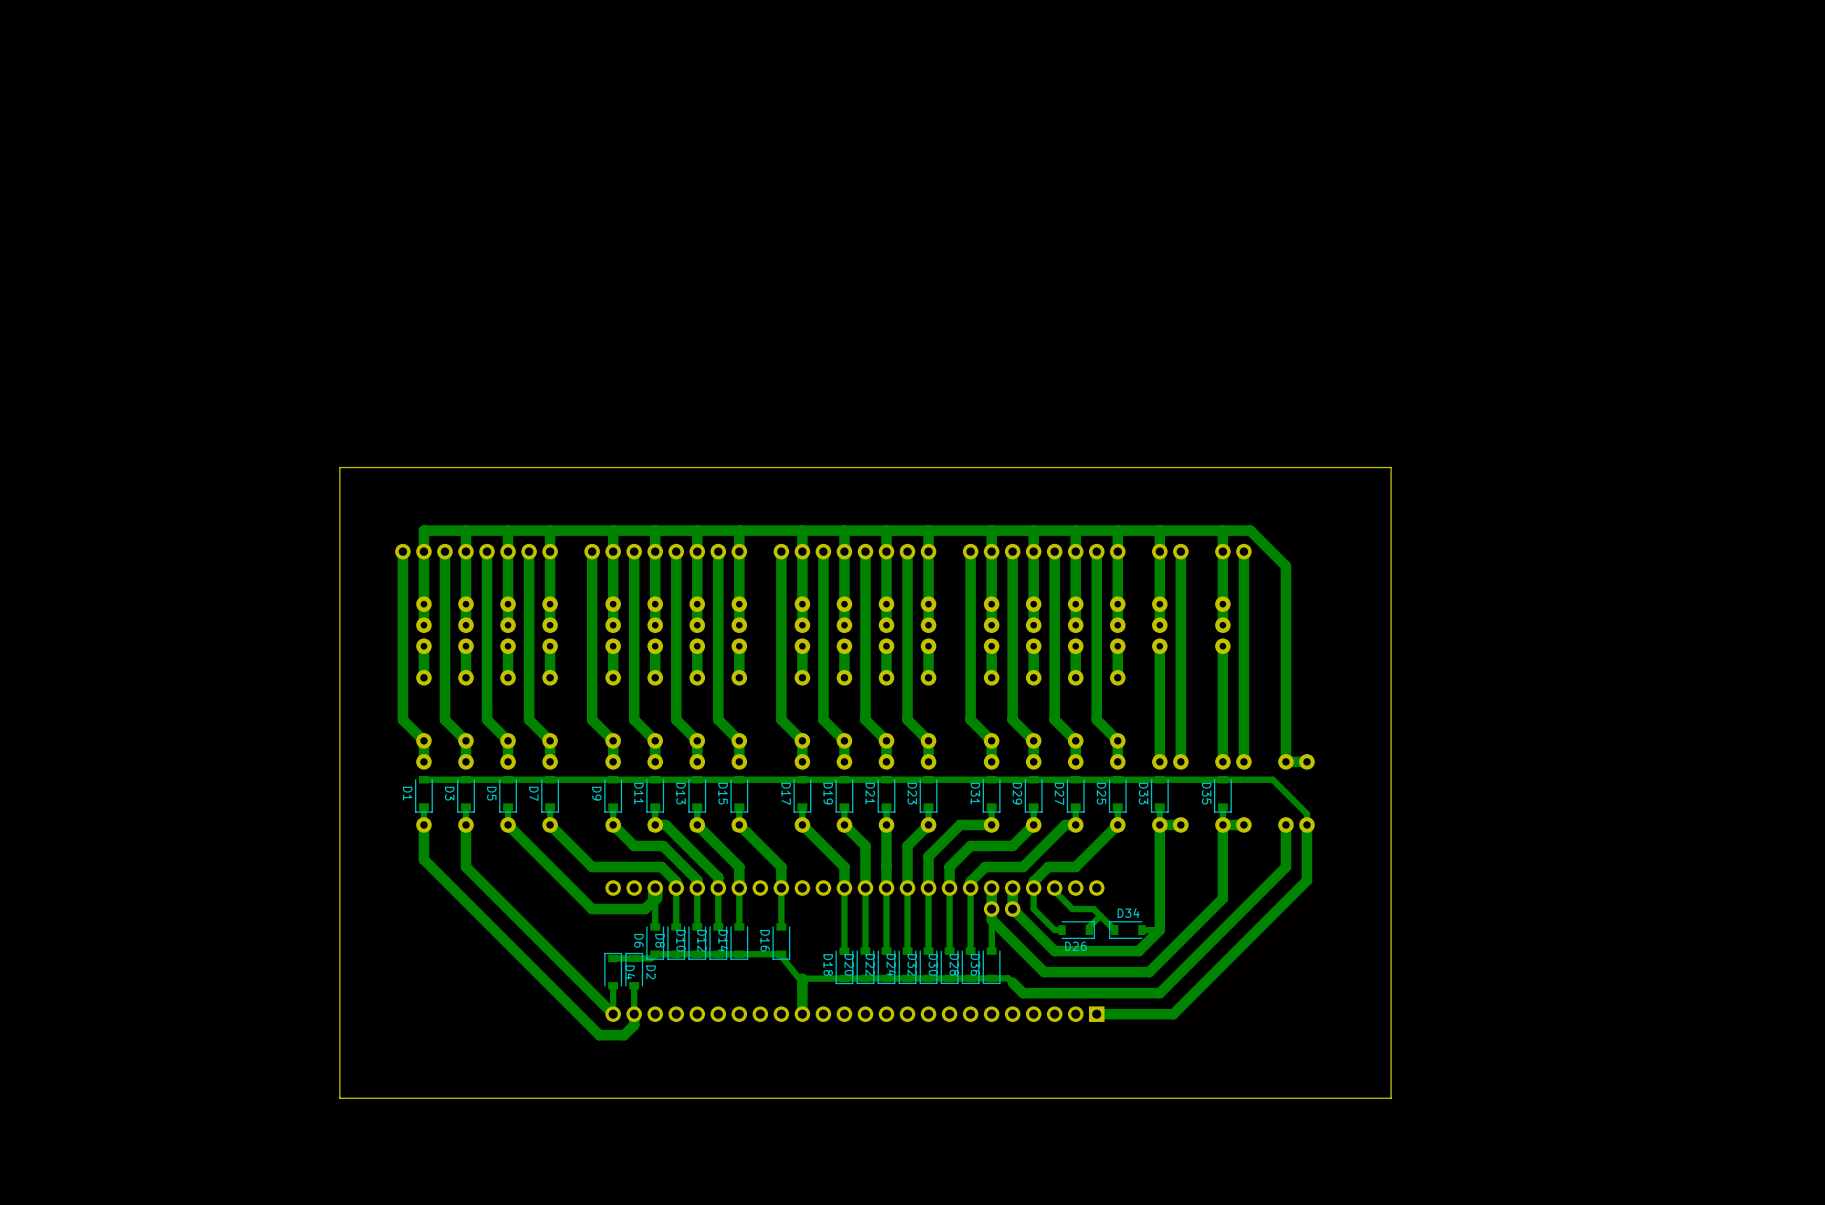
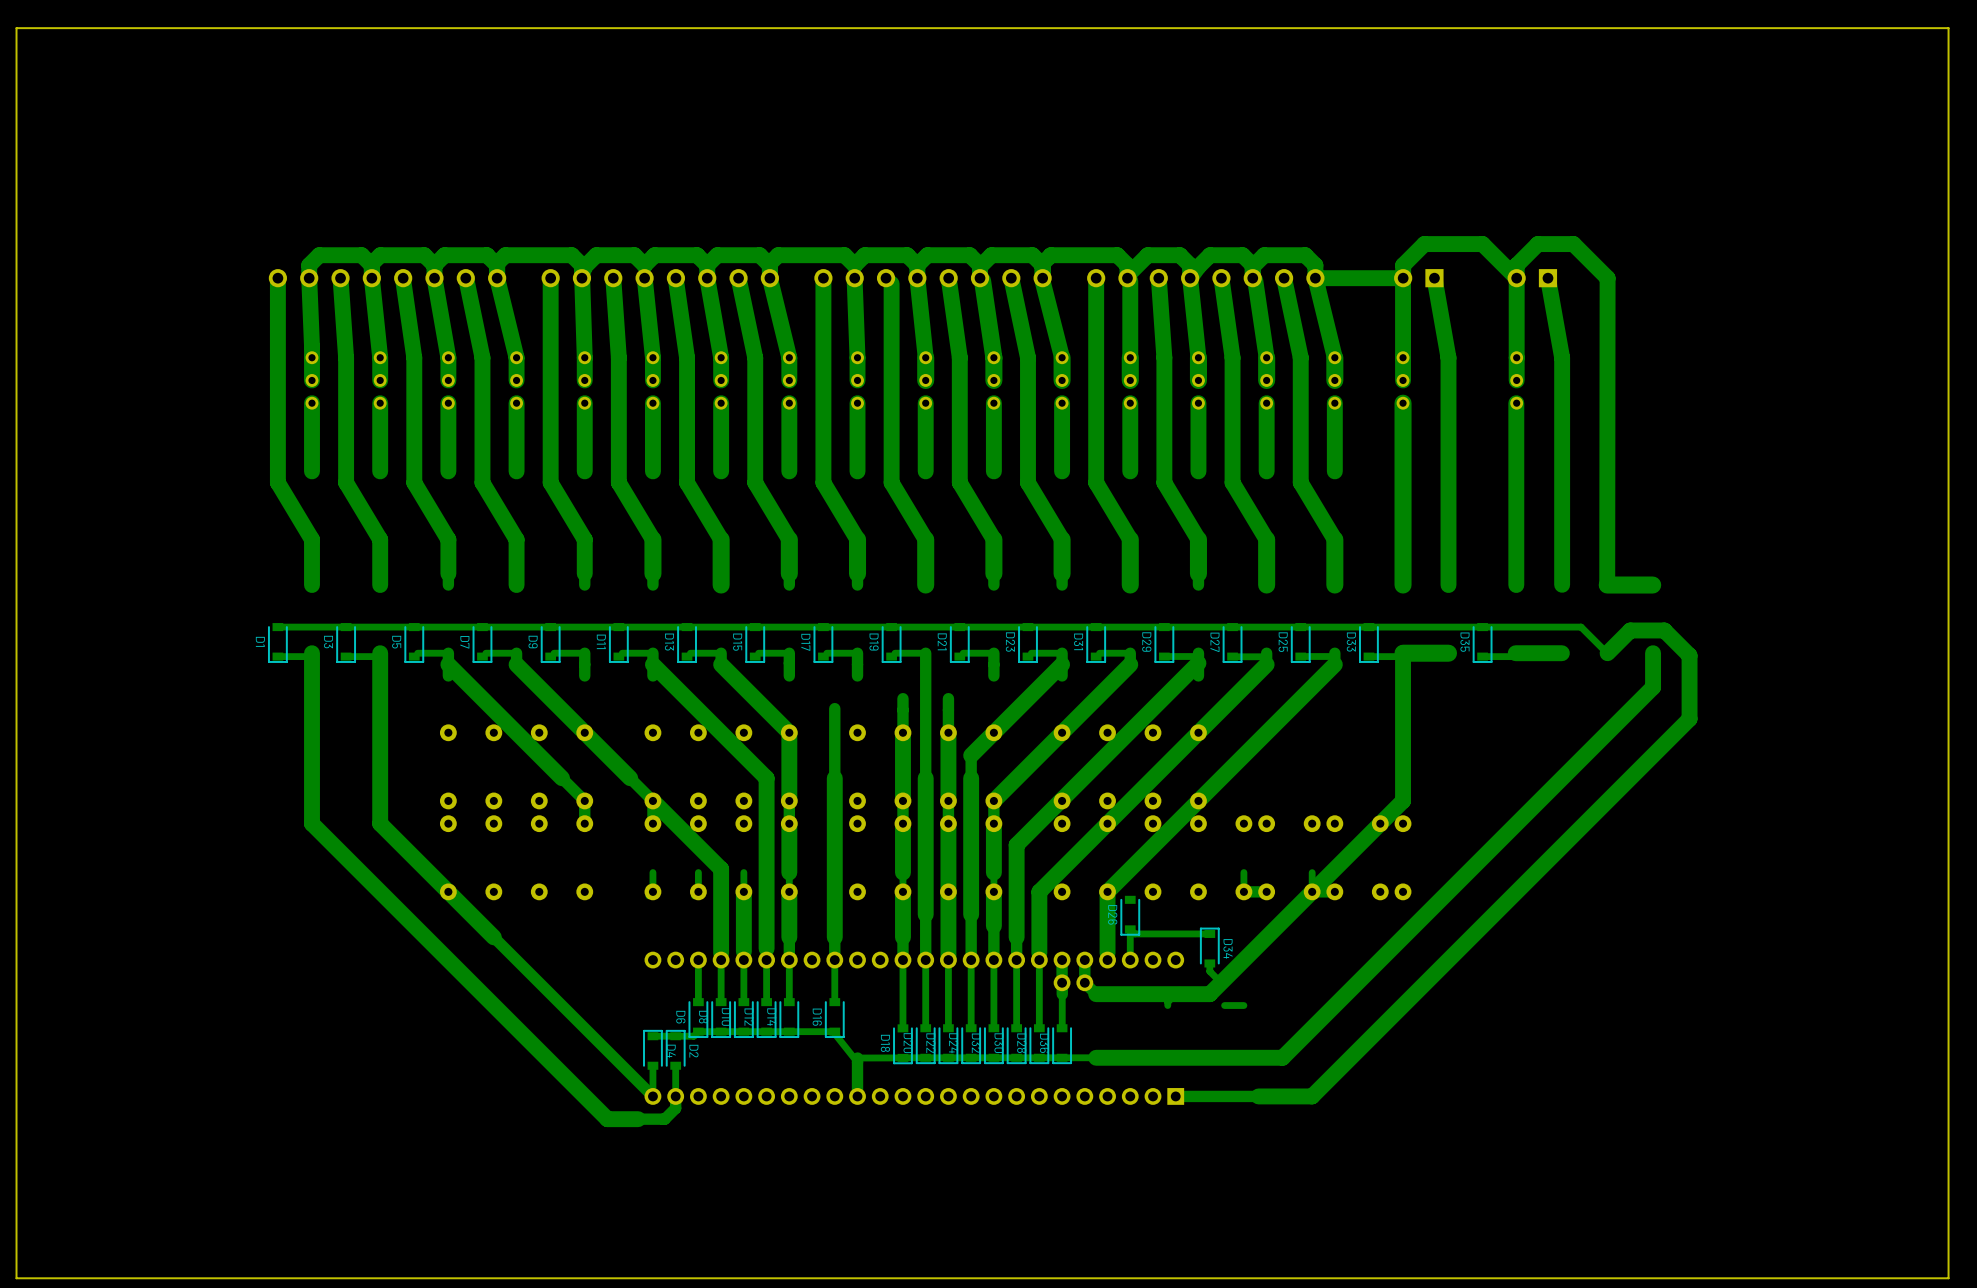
board edge: none -> (1948, 28) (16, 28) (16, 1278) (1948, 1278) (1948, 28)
track: none -> (371, 265) (361, 255) (319, 255) (309, 265) (312, 380)
track: none -> (434, 265) (424, 255) (380, 255) (371, 263) (380, 357) (380, 380)
track: none -> (434, 265) (434, 278) (448, 357) (448, 380)
track: none -> (497, 265) (487, 255) (444, 255) (434, 265)
track: none -> (707, 265) (707, 278) (721, 357) (721, 380)
track: none -> (707, 265) (697, 255) (654, 255) (644, 265) (634, 255) (596, 255) (584, 266) (581, 275)
track: none -> (769, 265) (759, 255) (717, 255) (707, 265)
track: none -> (917, 265) (925, 357) (925, 380)
track: none -> (917, 265) (907, 255) (864, 255) (854, 265) (844, 255) (778, 255) (769, 263) (769, 278) (789, 357) (789, 380)
track: none -> (917, 265) (927, 255) (969, 255) (980, 265) (980, 278)
track: none -> (1042, 265) (1032, 255) (991, 255) (980, 266)
track: none -> (1252, 266) (1264, 255) (1305, 255) (1315, 265) (1315, 278)
track: none -> (1127, 275) (1147, 255) (1180, 255) (1190, 265) (1190, 278)
track: none -> (644, 277) (652, 357) (652, 380)
track: none -> (277, 278) (277, 482) (312, 539) (312, 585)
track: none -> (340, 278) (346, 357) (346, 482) (380, 539) (380, 585)
part: none -> (387, 278)
track: none -> (466, 278) (482, 357) (482, 482) (516, 539) (516, 585)
track: none -> (550, 278) (550, 482) (584, 539) (584, 573)
track: none -> (582, 277) (584, 380)
track: none -> (581, 278) (581, 265) (571, 255) (505, 255) (497, 263) (497, 278) (516, 357) (516, 380)
track: none -> (613, 278) (618, 357) (618, 482) (652, 539) (652, 573)
part: none -> (660, 278)
track: none -> (675, 278) (687, 357) (687, 482) (721, 539) (721, 585)
track: none -> (738, 278) (755, 357) (755, 482) (789, 539) (789, 573)
track: none -> (823, 278) (823, 482) (857, 539) (857, 573)
track: none -> (854, 278) (857, 380)
part: none -> (933, 278)
track: none -> (948, 278) (959, 357) (959, 482) (993, 539) (993, 573)
track: none -> (1011, 278) (1027, 357) (1027, 482) (1062, 539) (1062, 573)
track: none -> (1096, 278) (1096, 482) (1130, 539) (1130, 585)
track: none -> (1127, 278) (1127, 265) (1117, 255) (1050, 255) (1042, 263) (1042, 278)
track: none -> (1158, 278) (1164, 357) (1164, 482) (1198, 539) (1198, 573)
track: none -> (1190, 278) (1198, 357) (1198, 380)
part: none -> (1205, 278)
track: none -> (1221, 278) (1232, 357) (1232, 482) (1266, 539) (1266, 585)
track: none -> (1252, 278) (1252, 265) (1242, 255) (1210, 255) (1190, 278)
track: none -> (1284, 278) (1300, 357) (1300, 482) (1334, 539) (1334, 585)
track: none -> (1315, 278) (1334, 357) (1334, 380)
track: none -> (1403, 278) (1403, 380)
part: none -> (1418, 278)
track: none -> (1434, 278) (1448, 357) (1448, 585)
track: none -> (1516, 278) (1482, 244) (1424, 244) (1403, 265) (1403, 278) (1315, 278)
part: none -> (1532, 278)
track: none -> (1547, 278) (1562, 357) (1562, 584)
track: none -> (982, 280) (993, 357) (993, 380)
track: none -> (1130, 280) (1130, 380)
track: none -> (1255, 280) (1266, 357) (1266, 380)
track: none -> (1042, 281) (1062, 357) (1062, 380)
track: none -> (891, 283) (891, 482) (925, 539) (925, 585)
part: none -> (312, 380)
part: none -> (380, 380)
part: none -> (448, 380)
part: none -> (516, 380)
part: none -> (584, 380)
part: none -> (652, 380)
part: none -> (721, 380)
part: none -> (789, 380)
part: none -> (857, 380)
part: none -> (925, 380)
part: none -> (993, 380)
part: none -> (1062, 380)
part: none -> (1130, 380)
part: none -> (1198, 380)
part: none -> (1266, 380)
part: none -> (1334, 380)
part: none -> (1403, 380)
track: none -> (1516, 380) (1516, 265) (1537, 244) (1573, 244) (1607, 278) (1607, 585) (1652, 585)
part: none -> (1516, 380)
track: none -> (312, 403) (312, 471)
track: none -> (380, 403) (380, 471)
track: none -> (448, 403) (448, 471)
track: none -> (516, 403) (516, 471)
track: none -> (584, 403) (584, 471)
track: none -> (652, 403) (652, 471)
track: none -> (721, 403) (721, 471)
track: none -> (789, 403) (789, 471)
track: none -> (857, 403) (857, 471)
track: none -> (925, 403) (925, 471)
track: none -> (993, 403) (993, 471)
track: none -> (1062, 403) (1062, 471)
track: none -> (1130, 403) (1130, 471)
track: none -> (1266, 403) (1266, 471)
track: none -> (1334, 403) (1334, 471)
track: none -> (1403, 403) (1403, 585)
track: none -> (1516, 403) (1516, 585)
board edge: (1391, 467) (339, 467) (339, 1098) (1391, 1098) (1391, 467) -> none
track: (423, 530) (1250, 530) (1285, 566) (1285, 761) (1306, 761) -> (448, 573) (448, 539) (414, 482) (414, 357) (402, 278)
track: (466, 530) (466, 625) -> none
track: (508, 530) (508, 625) -> none
track: (655, 530) (655, 625) -> none
track: (697, 530) (697, 625) -> none
track: (844, 530) (844, 625) -> none
track: (886, 530) (886, 625) -> none
track: (1033, 530) (1033, 625) -> none
track: (1075, 530) (1075, 625) -> none
track: (1159, 530) (1159, 625) -> none
track: (1222, 530) (1222, 625) -> none
track: (423, 541) (423, 604) -> (417, 653) (448, 653)
track: (550, 541) (550, 604) -> (554, 653) (584, 653)
track: (613, 541) (613, 604) -> (622, 653) (652, 653)
track: (739, 541) (739, 604) -> (758, 653) (789, 653)
track: (802, 541) (802, 604) -> (826, 653) (857, 653)
track: (928, 541) (928, 604) -> (963, 653) (993, 653)
track: (991, 541) (991, 604) -> (1031, 653) (1062, 653)
track: (1117, 541) (1117, 604) -> (1198, 403) (1198, 471)
track: (402, 551) (402, 719) (423, 740) (423, 761) -> none
track: (444, 551) (444, 719) (466, 740) (466, 761) -> none
part: (476, 551) -> none
track: (487, 551) (487, 604) -> (485, 653) (516, 653)
track: (529, 551) (529, 719) -> (448, 664) (562, 778)
track: (592, 551) (592, 719) -> none
track: (634, 551) (634, 719) (655, 740) (655, 761) -> none
part: (665, 551) -> none
track: (676, 551) (676, 604) -> (690, 653) (721, 653)
track: (718, 551) (718, 719) (739, 740) -> none
track: (781, 551) (781, 655) -> none
track: (823, 551) (823, 719) (844, 740) -> (902, 732) (902, 800)
part: (854, 551) -> none
track: (865, 551) (865, 604) -> (895, 653) (925, 653)
track: (907, 551) (907, 698) -> (1062, 664) (971, 755)
track: (970, 551) (970, 719) (991, 740) (991, 761) -> none
track: (1012, 551) (1012, 719) (1033, 740) (1033, 761) -> none
part: (1044, 551) -> none
track: (1054, 551) (1054, 604) -> (1099, 653) (1130, 653)
track: (1096, 551) (1096, 719) (1117, 740) (1117, 761) -> none
part: (1170, 551) -> none
track: (1180, 551) (1180, 604) -> none
part: (1233, 551) -> none
track: (1243, 551) (1243, 604) -> none
track: none -> (277, 627) (1581, 627) (1607, 653)
track: none -> (1561, 653) (1515, 653)
track: none -> (308, 656) (277, 656)
track: none -> (376, 656) (346, 656)
track: none -> (1195, 656) (1164, 656)
track: none -> (1263, 656) (1232, 656)
track: none -> (1331, 656) (1300, 656)
track: none -> (1399, 656) (1368, 656)
track: none -> (1513, 656) (1482, 656)
track: (487, 614) (487, 719) (508, 740) (508, 761) -> (516, 664) (630, 778)
track: (676, 614) (676, 719) (697, 740) (697, 761) -> (721, 664) (789, 732) (789, 800)
track: (1054, 614) (1054, 719) (1075, 740) (1075, 761) -> (1130, 664) (993, 800)
track: (1180, 614) (1180, 761) -> none
track: (1243, 614) (1243, 761) -> none
part: (423, 625) -> none
part: (466, 625) -> none
part: (508, 625) -> none
part: (550, 625) -> none
part: (613, 625) -> none
part: (655, 625) -> none
part: (697, 625) -> none
part: (739, 625) -> none
part: (802, 625) -> none
part: (844, 625) -> none
part: (886, 625) -> none
part: (928, 625) -> none
part: (991, 625) -> none
part: (1033, 625) -> none
part: (1075, 625) -> none
part: (1117, 625) -> none
part: (1159, 625) -> none
part: (1222, 625) -> none
track: (423, 646) (423, 677) -> none
track: (466, 646) (466, 677) -> none
track: (508, 646) (508, 677) -> none
track: (550, 646) (550, 677) -> none
track: (613, 646) (613, 677) -> none
track: (655, 646) (655, 677) -> none
track: (697, 646) (697, 677) -> none
track: (739, 646) (739, 677) -> none
track: (802, 646) (802, 677) -> none
track: (928, 646) (928, 677) -> none
track: (991, 646) (991, 677) -> none
track: (1033, 646) (1033, 677) -> none
track: (1075, 646) (1075, 677) -> none
track: (1117, 646) (1117, 677) -> none
track: (1159, 646) (1159, 761) -> none
track: (1222, 646) (1222, 761) -> none
track: (781, 719) (802, 740) (802, 761) -> (834, 778) (834, 937)
track: (865, 719) (886, 740) -> (948, 732) (948, 800)
track: none -> (925, 778) (925, 914)
track: (907, 719) (928, 740) -> (971, 778) (971, 914)
track: none -> (789, 823) (789, 872)
track: none -> (902, 823) (902, 872)
track: none -> (948, 823) (948, 872)
track: none -> (993, 823) (993, 872)
track: (423, 779) (1272, 779) (1306, 813) (1306, 880) (1173, 1014) -> (1607, 653) (1630, 630) (1664, 630) (1689, 655) (1689, 719) (1312, 1096) (1258, 1096)
D1 position: (423, 794) -> (277, 642)
D3 position: (466, 794) -> (346, 642)
D5 position: (508, 794) -> (414, 642)
D7 position: (550, 794) -> (482, 642)
D9 position: (613, 794) -> (550, 642)
D11 position: (655, 794) -> (618, 642)
D13 position: (697, 794) -> (687, 642)
D15 position: (739, 794) -> (755, 642)
D17 position: (802, 794) -> (823, 642)
D19 position: (844, 794) -> (891, 642)
D21 position: (886, 794) -> (959, 642)
D23 position: (928, 794) -> (1027, 642)
D31 position: (991, 794) -> (1096, 642)
D29 position: (1033, 794) -> (1164, 642)
D27 position: (1075, 794) -> (1232, 642)
D25 position: (1117, 794) -> (1300, 642)
D33 position: (1159, 794) -> (1368, 642)
D35 position: (1222, 794) -> (1482, 642)
track: (423, 807) (423, 859) (599, 1035) -> (312, 653) (312, 823) (607, 1119) (638, 1119)
track: (466, 807) (466, 867) -> (380, 653) (380, 823) (493, 937)
track: (508, 807) (508, 824) (592, 909) (645, 909) (655, 899) (655, 888) (655, 897) -> none
track: (550, 807) (550, 824) (592, 867) (661, 867) (676, 881) -> (652, 800) (721, 869) (721, 953)
track: (802, 807) (802, 824) (844, 867) -> none
track width: thin (886, 807) (886, 888) -> thick (948, 872) (948, 960)
track: (991, 807) (991, 824) (960, 824) (928, 856) -> none
track: (1033, 807) (1033, 824) (1012, 845) (970, 845) (949, 867) -> (1198, 663) (1016, 844) (1016, 937)
track: (1075, 807) (1075, 824) (1065, 824) (1023, 867) (985, 867) (970, 881) -> (1266, 664) (1039, 891) (1039, 953)
track: (1117, 807) (1117, 824) (1075, 867) (1048, 867) (1033, 881) -> (1334, 664) (1107, 891) (1107, 953)
track: (613, 824) (634, 845) (663, 845) (697, 880) -> (743, 891) (743, 951)
track: (655, 824) (665, 824) (718, 877) -> (652, 664) (766, 778) (766, 948)
track: (844, 824) (865, 845) -> (902, 891) (902, 937)
track: (928, 824) (907, 845) -> (993, 891) (993, 925)
track: (1159, 824) (1159, 930) (1138, 951) (1054, 951) (1023, 919) -> (1448, 653) (1403, 653) (1403, 800) (1209, 994) (1096, 994)
track: (1222, 824) (1222, 898) (1149, 972) (1044, 972) (991, 919) -> none
track: (1285, 824) (1285, 867) (1159, 993) (1023, 993) (1008, 978) -> (1653, 653) (1653, 687) (1282, 1057) (1080, 1057)
track: (693, 828) (697, 824) (739, 867) -> (789, 891) (789, 937)
track: (735, 828) (739, 824) (781, 867) -> none
track: (1033, 888) (1033, 909) (1054, 930) (1062, 930) -> none
track: (1054, 888) (1054, 891) (1072, 909) (1093, 909) (1114, 930) -> (1130, 960) (1130, 929) (1134, 933) (1209, 933)
track: none -> (1209, 963) (1209, 971) (1221, 982)
D26 rotation: 0° (1076, 930) -> 90° clockwise (1130, 915)
D26 position: (1076, 930) -> (1130, 915)
D34 rotation: 0° (1127, 930) -> 90° clockwise (1209, 947)
D34 position: (1127, 930) -> (1209, 947)

